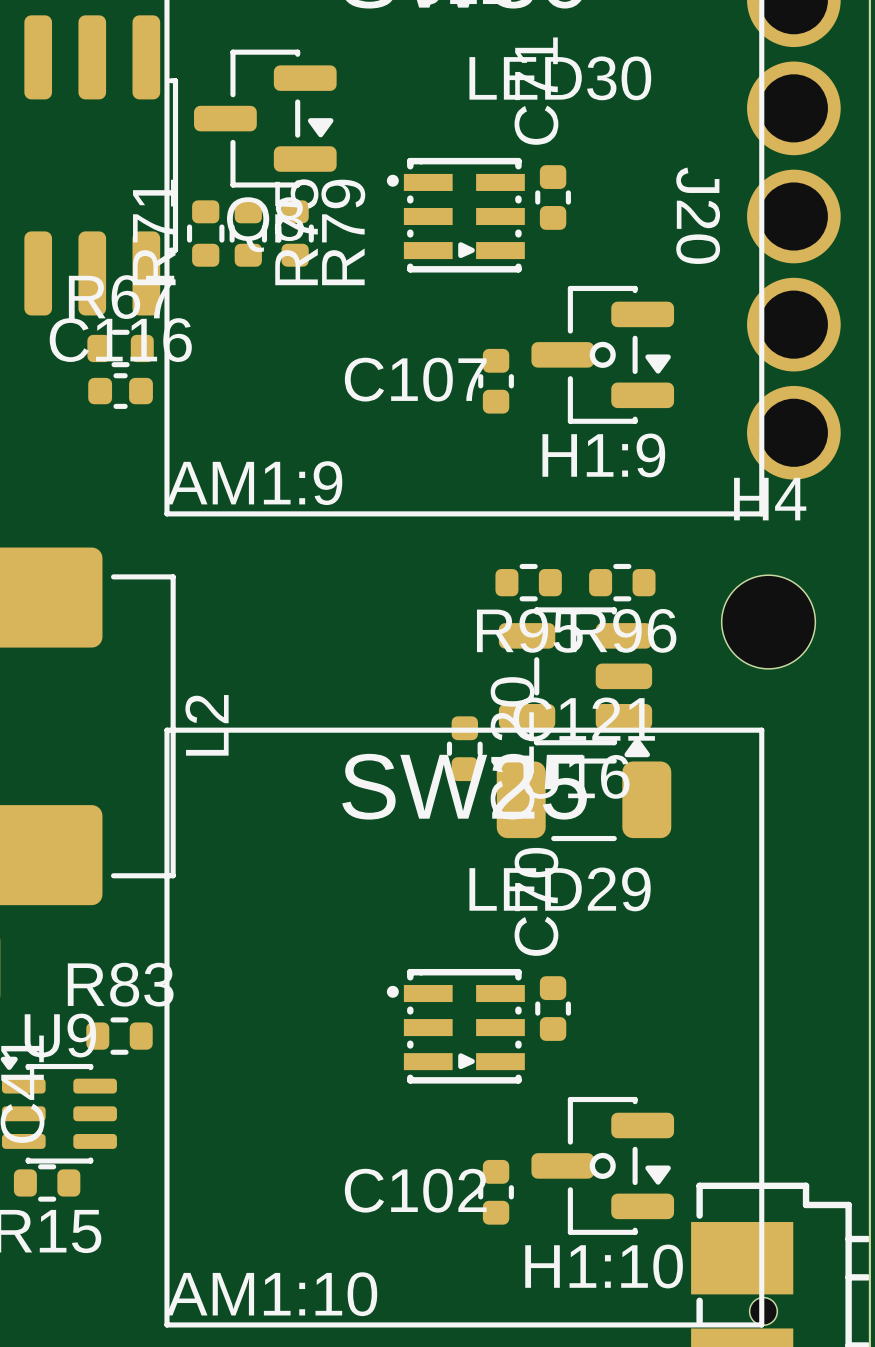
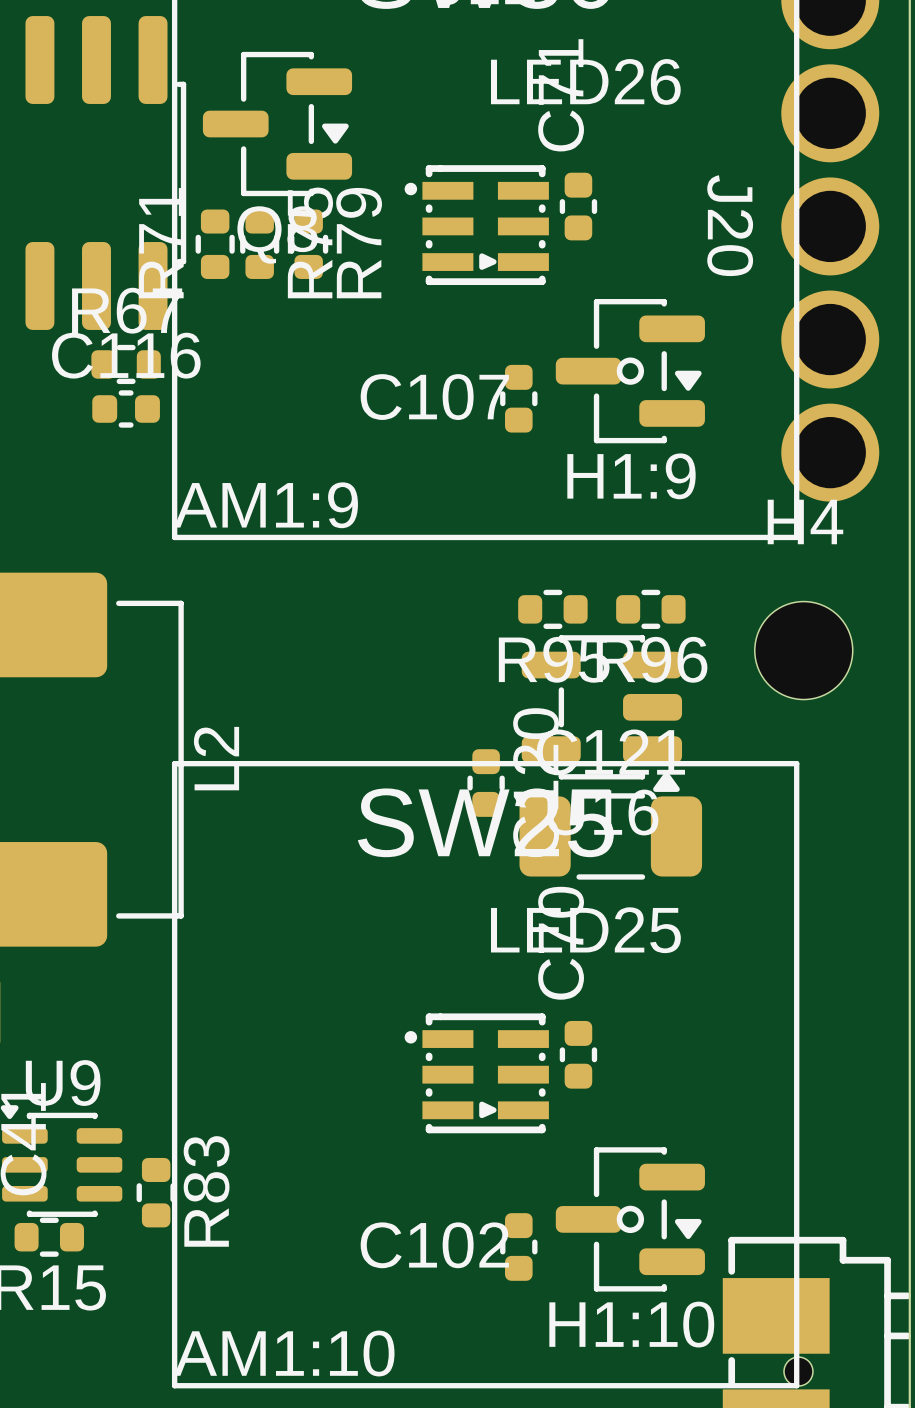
LED30 name: LED30 (560, 78) -> LED26 (585, 81)
LED29 name: LED29 (560, 889) -> LED25 (585, 930)
R83 rotation: 0° (119, 1036) -> 90° clockwise (156, 1192)
R83 position: (119, 1036) -> (156, 1192)

